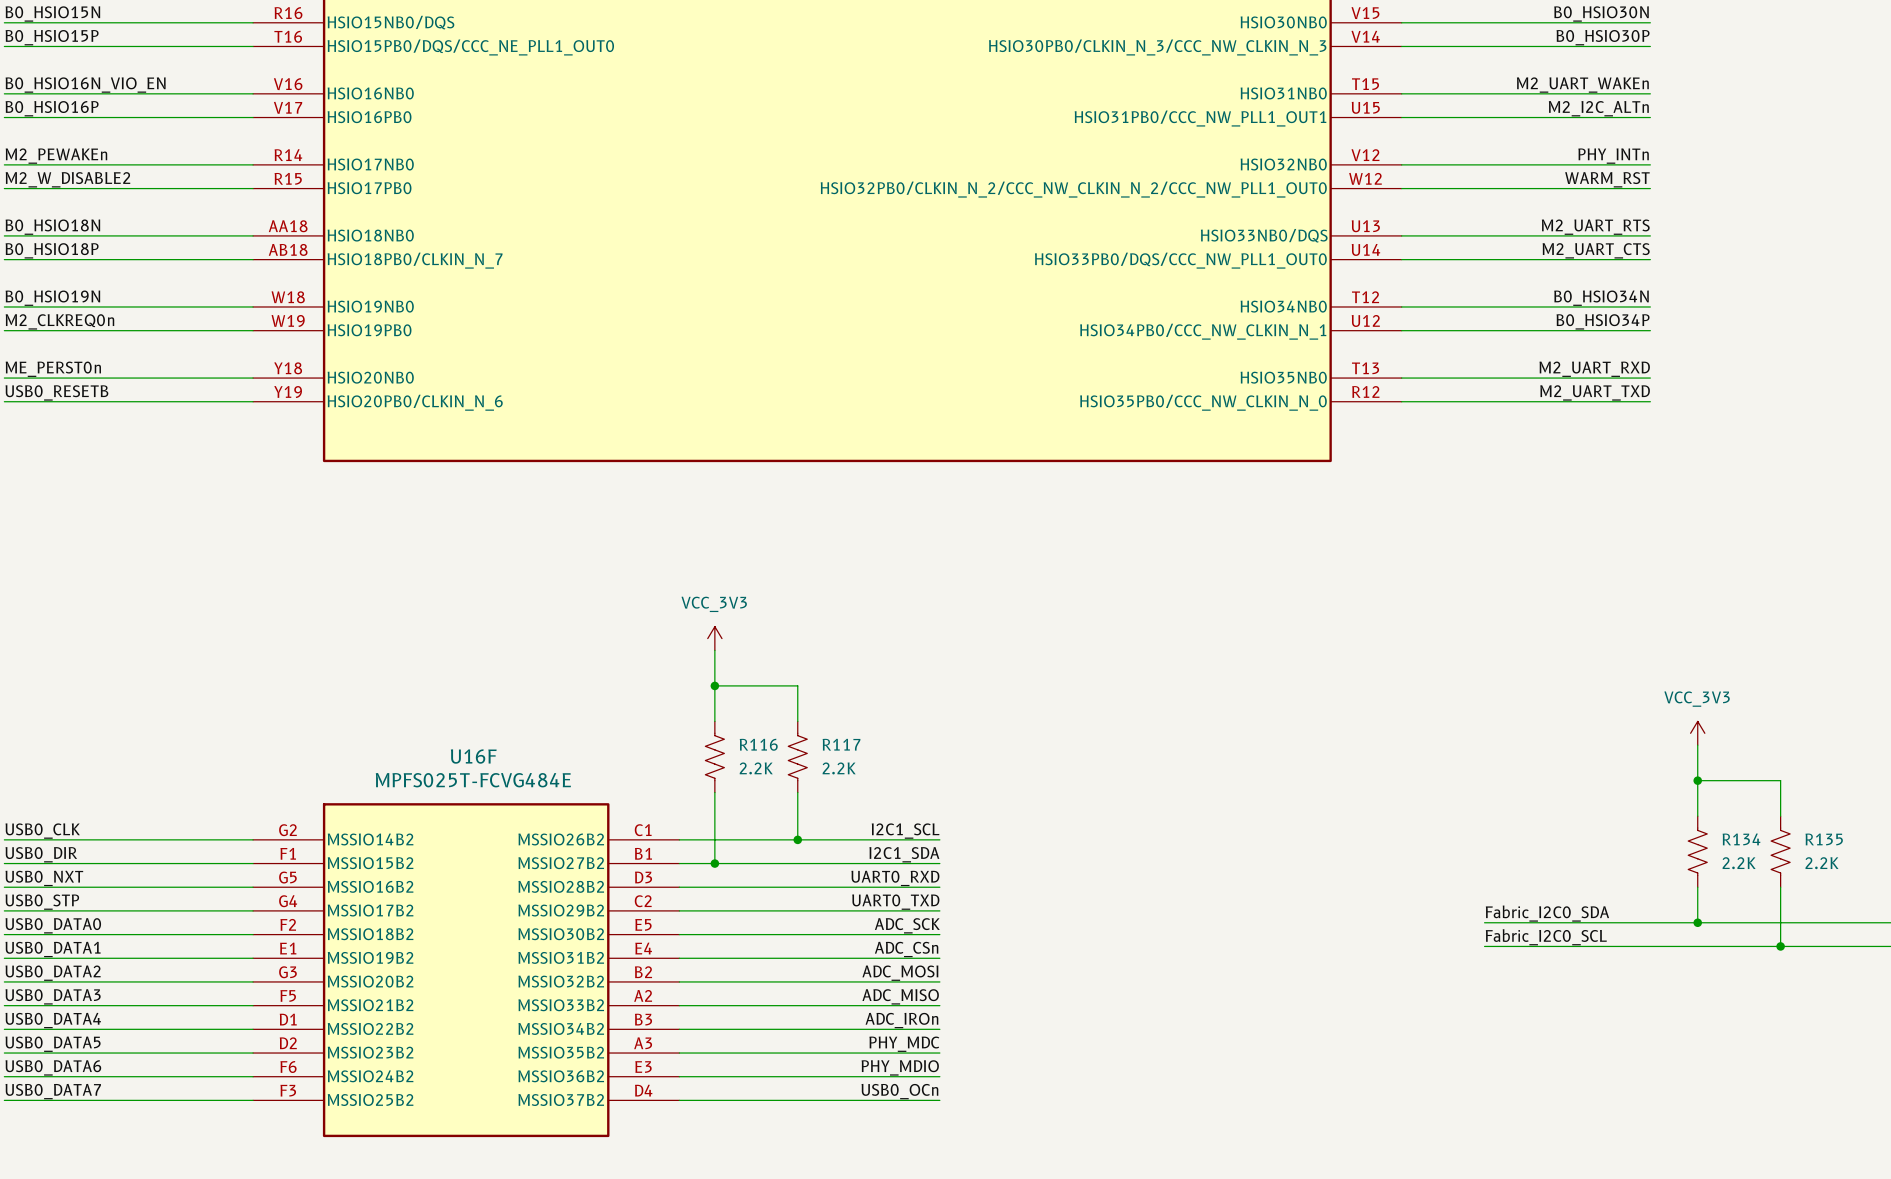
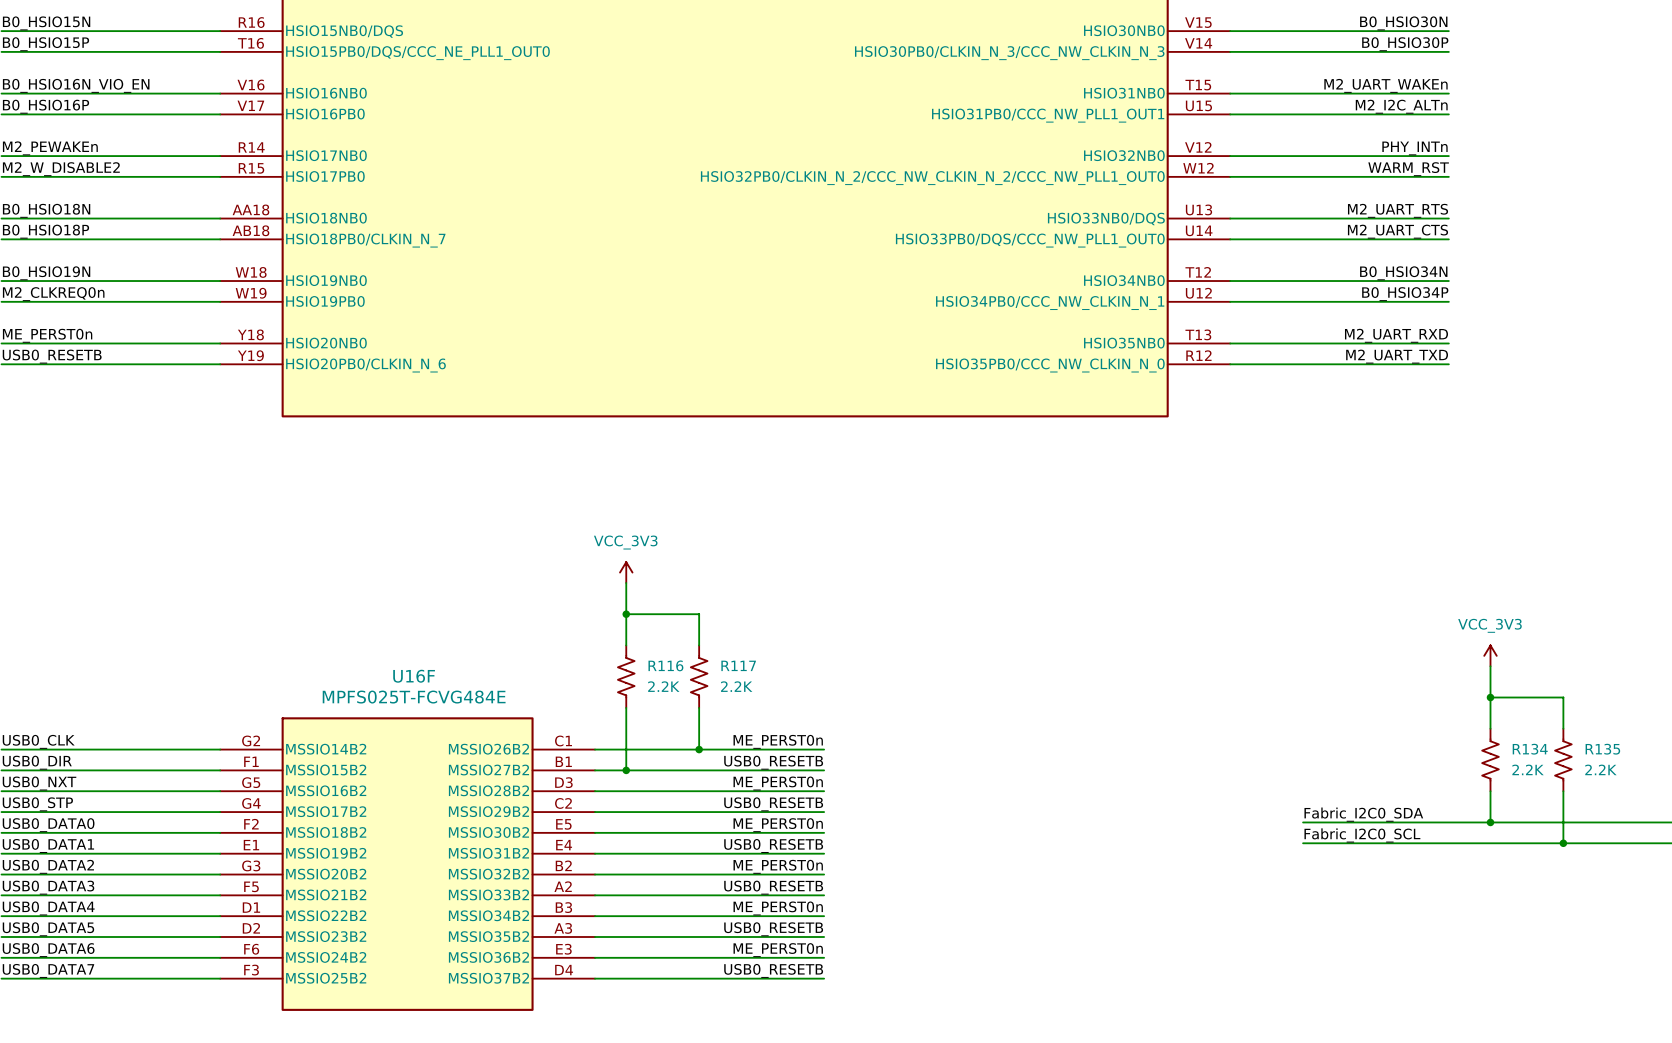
label: I2C1_SCL (905, 831) -> ME_PERST0n (778, 741)
label: I2C1_SDA (904, 854) -> USB0_RESETB (773, 762)
label: UART0_RXD (895, 878) -> ME_PERST0n (778, 783)
label: UART0_TXD (895, 902) -> USB0_RESETB (773, 804)
label: ADC_SCK (907, 925) -> ME_PERST0n (778, 825)
label: ADC_CSn (906, 949) -> USB0_RESETB (773, 845)
label: ADC_MOSI (900, 973) -> ME_PERST0n (778, 866)
label: ADC_MISO (900, 996) -> USB0_RESETB (773, 887)
label: ADC_IROn (901, 1020) -> ME_PERST0n (778, 908)
label: PHY_MDC (904, 1044) -> USB0_RESETB (773, 929)
label: PHY_MDIO (900, 1067) -> ME_PERST0n (778, 950)
label: USB0_OCn (899, 1091) -> USB0_RESETB (773, 970)

